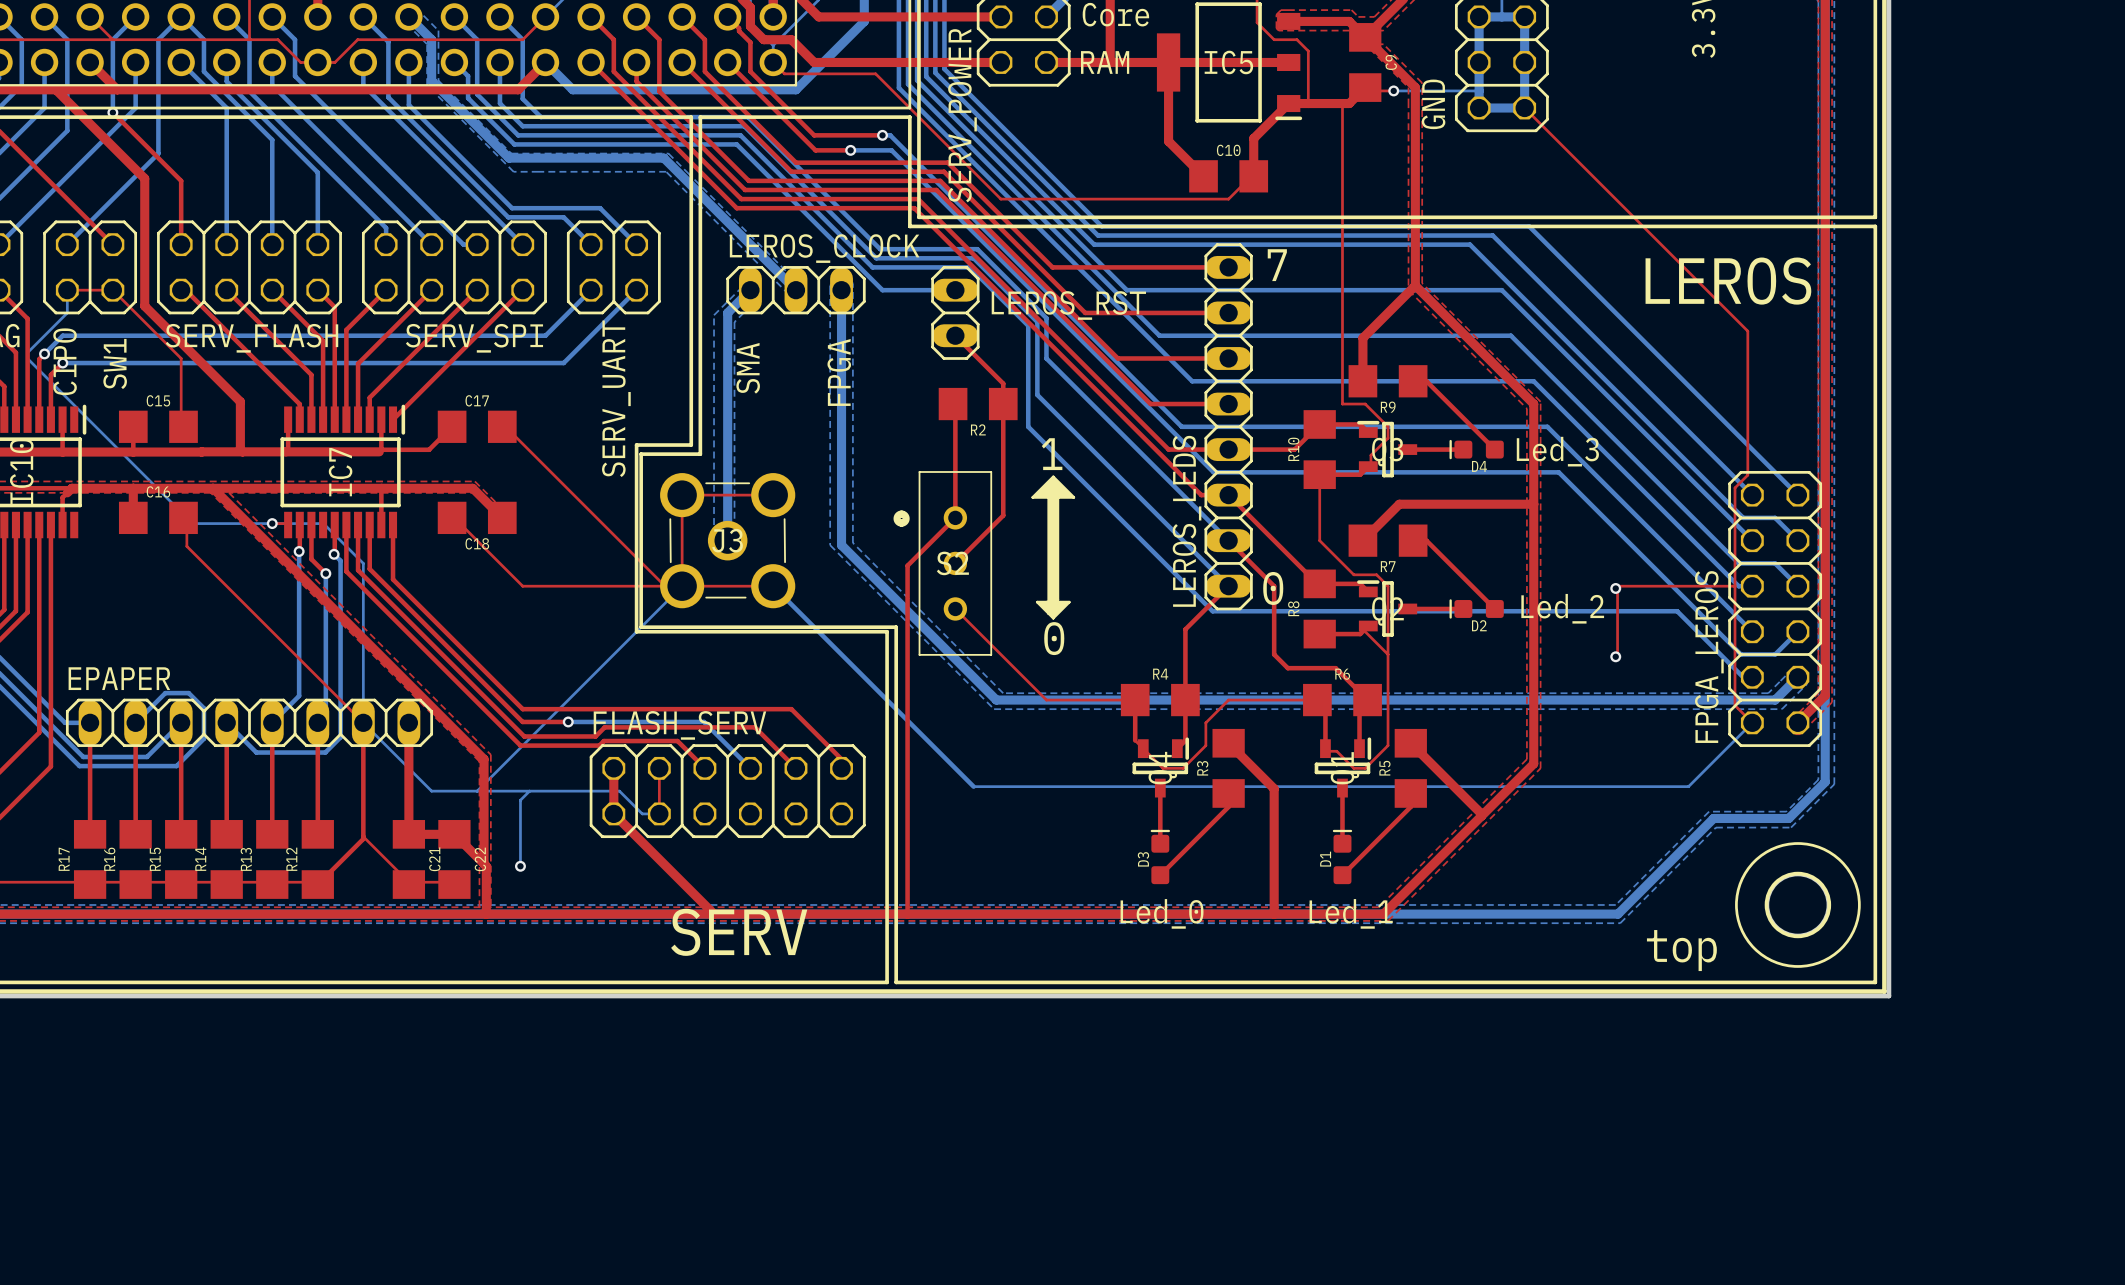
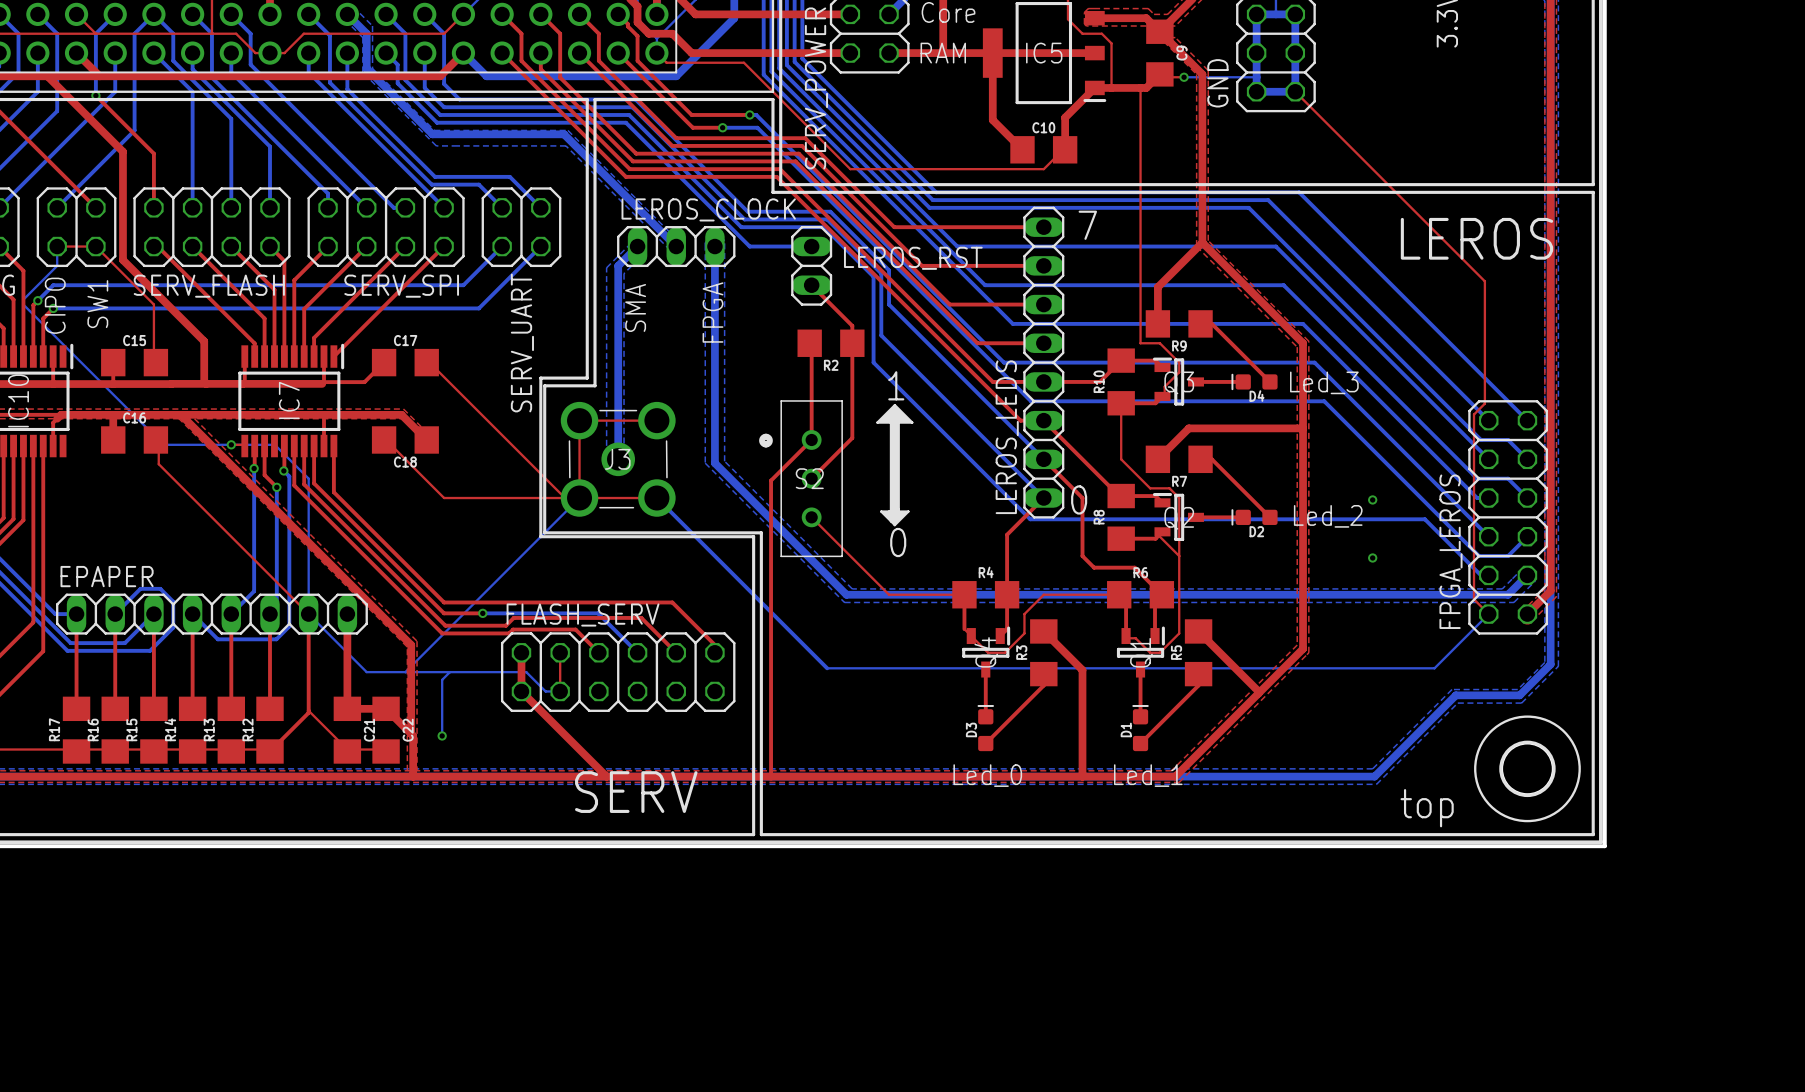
top track: (1735, 586) (1617, 586) (1615, 588) (1617, 589) (1617, 655) (1615, 656) -> none

